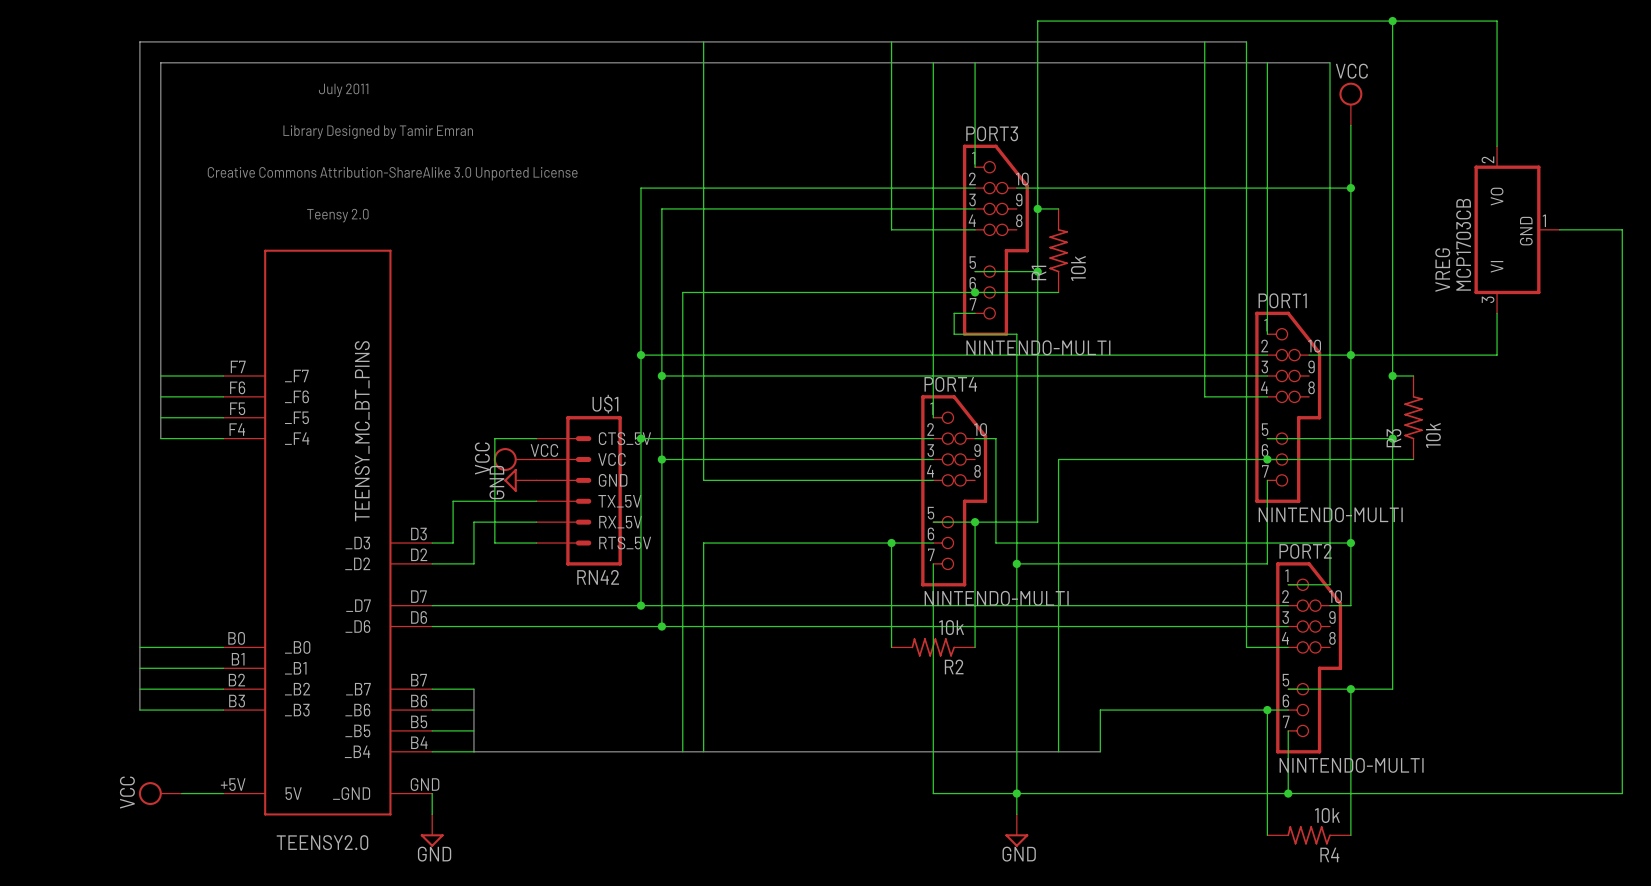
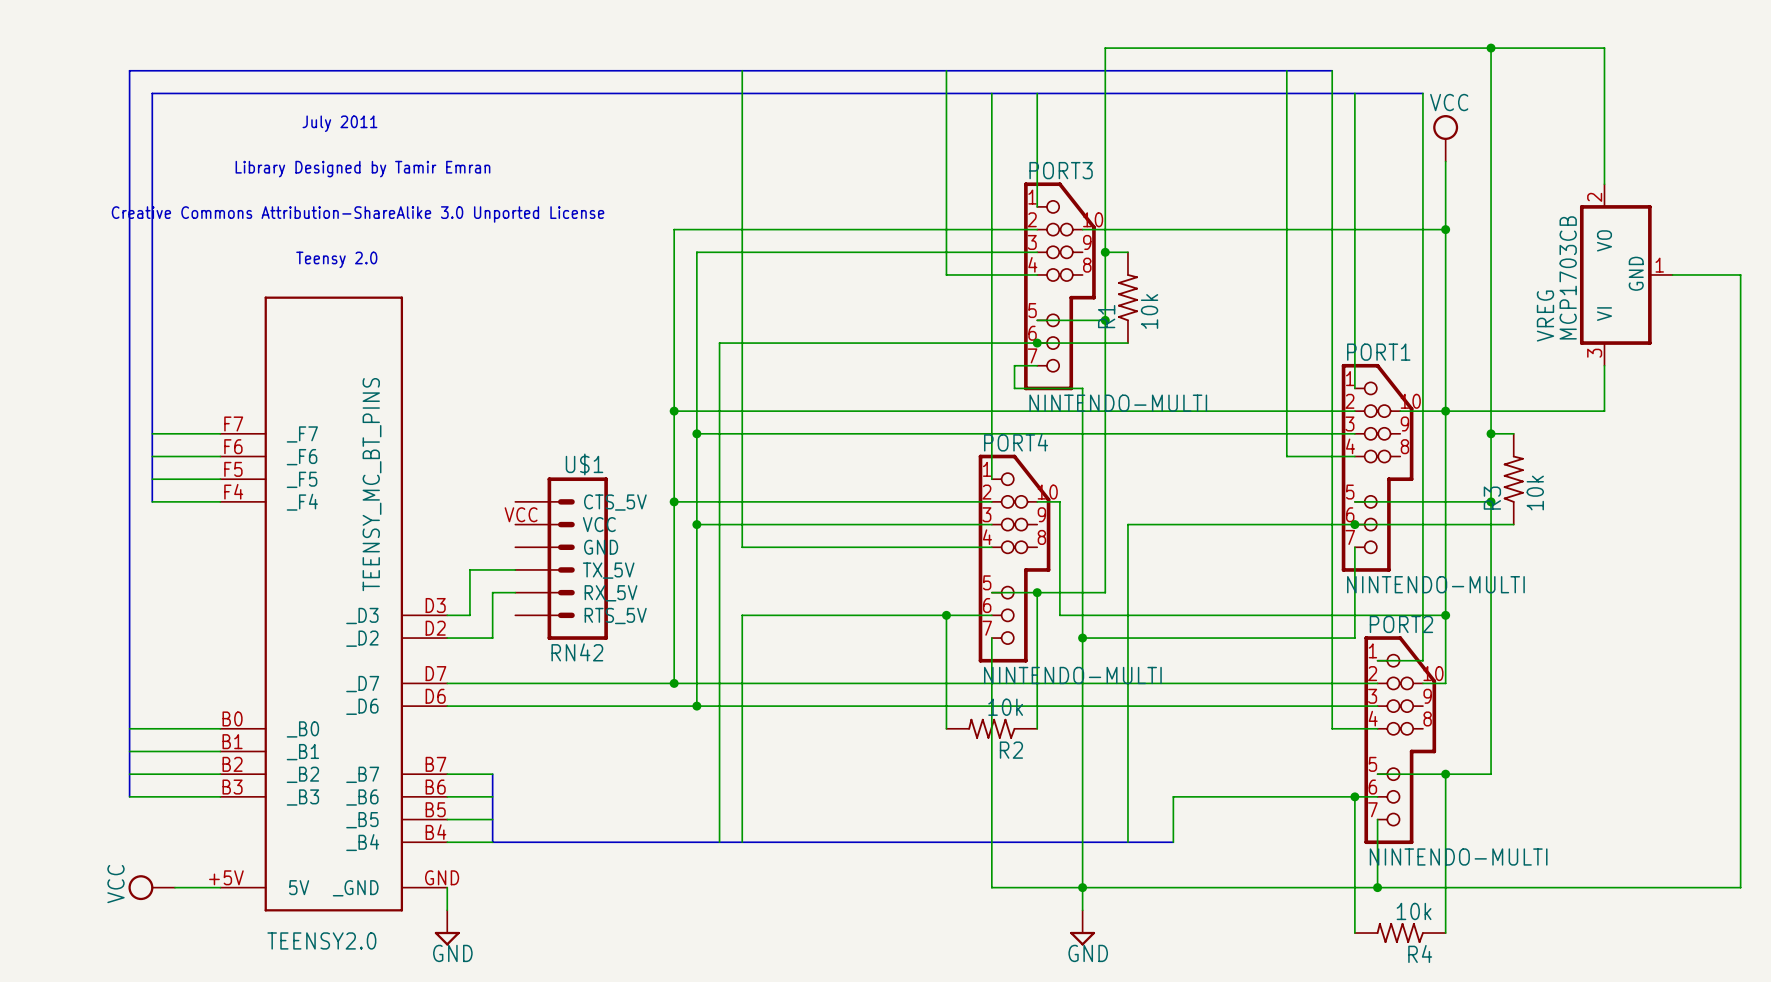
wire: (536, 438) (494, 438) (494, 543) (536, 543) -> none
power symbol: VCC (515, 459) -> none
power symbol: GND (520, 480) -> none
U$1 position: (579, 490) -> (561, 558)

